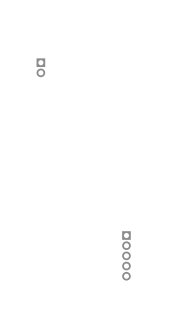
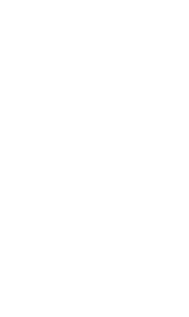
part: (40, 67) -> none
part: (126, 255) -> none

